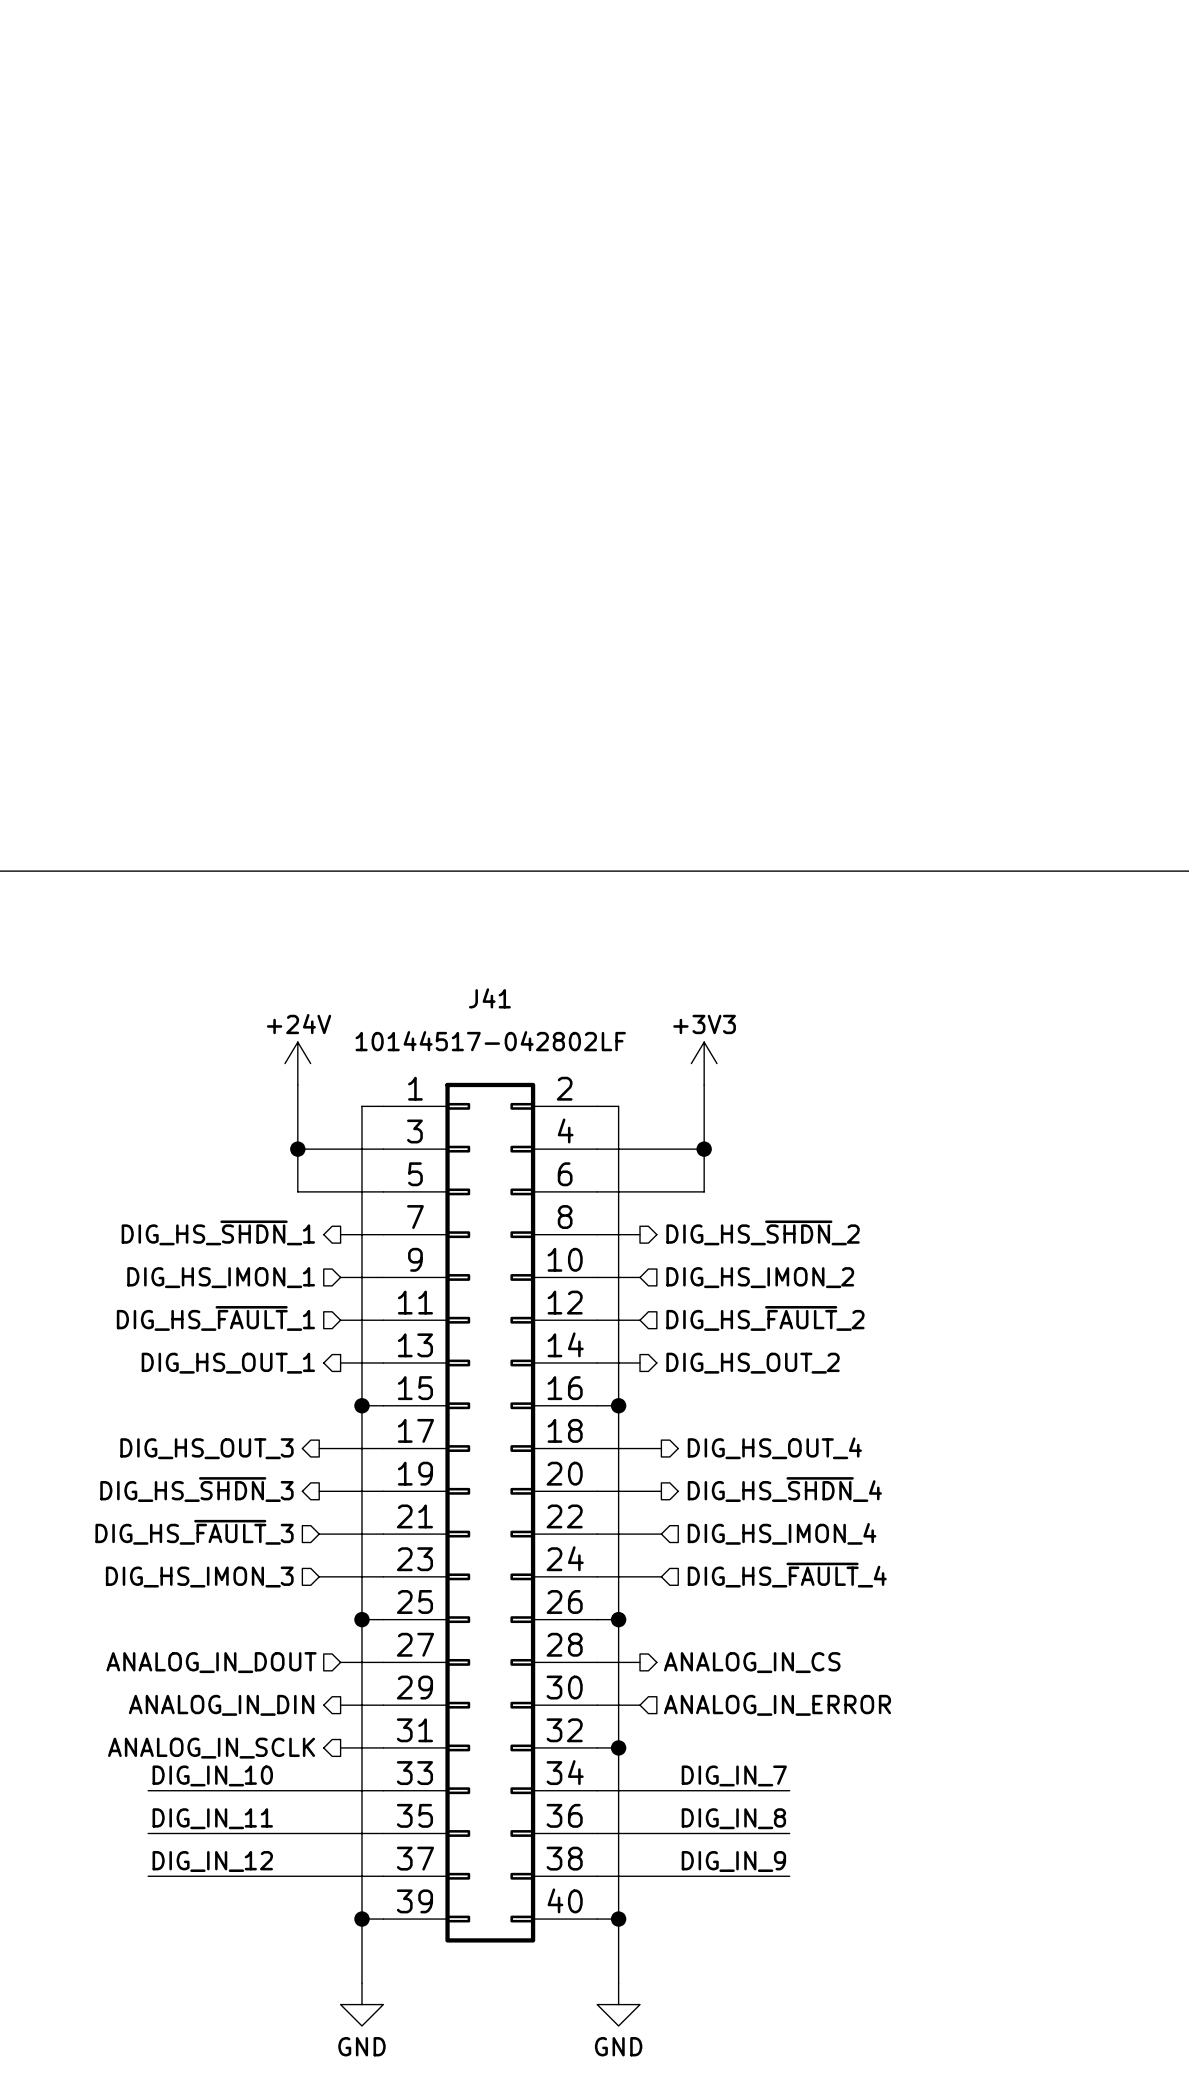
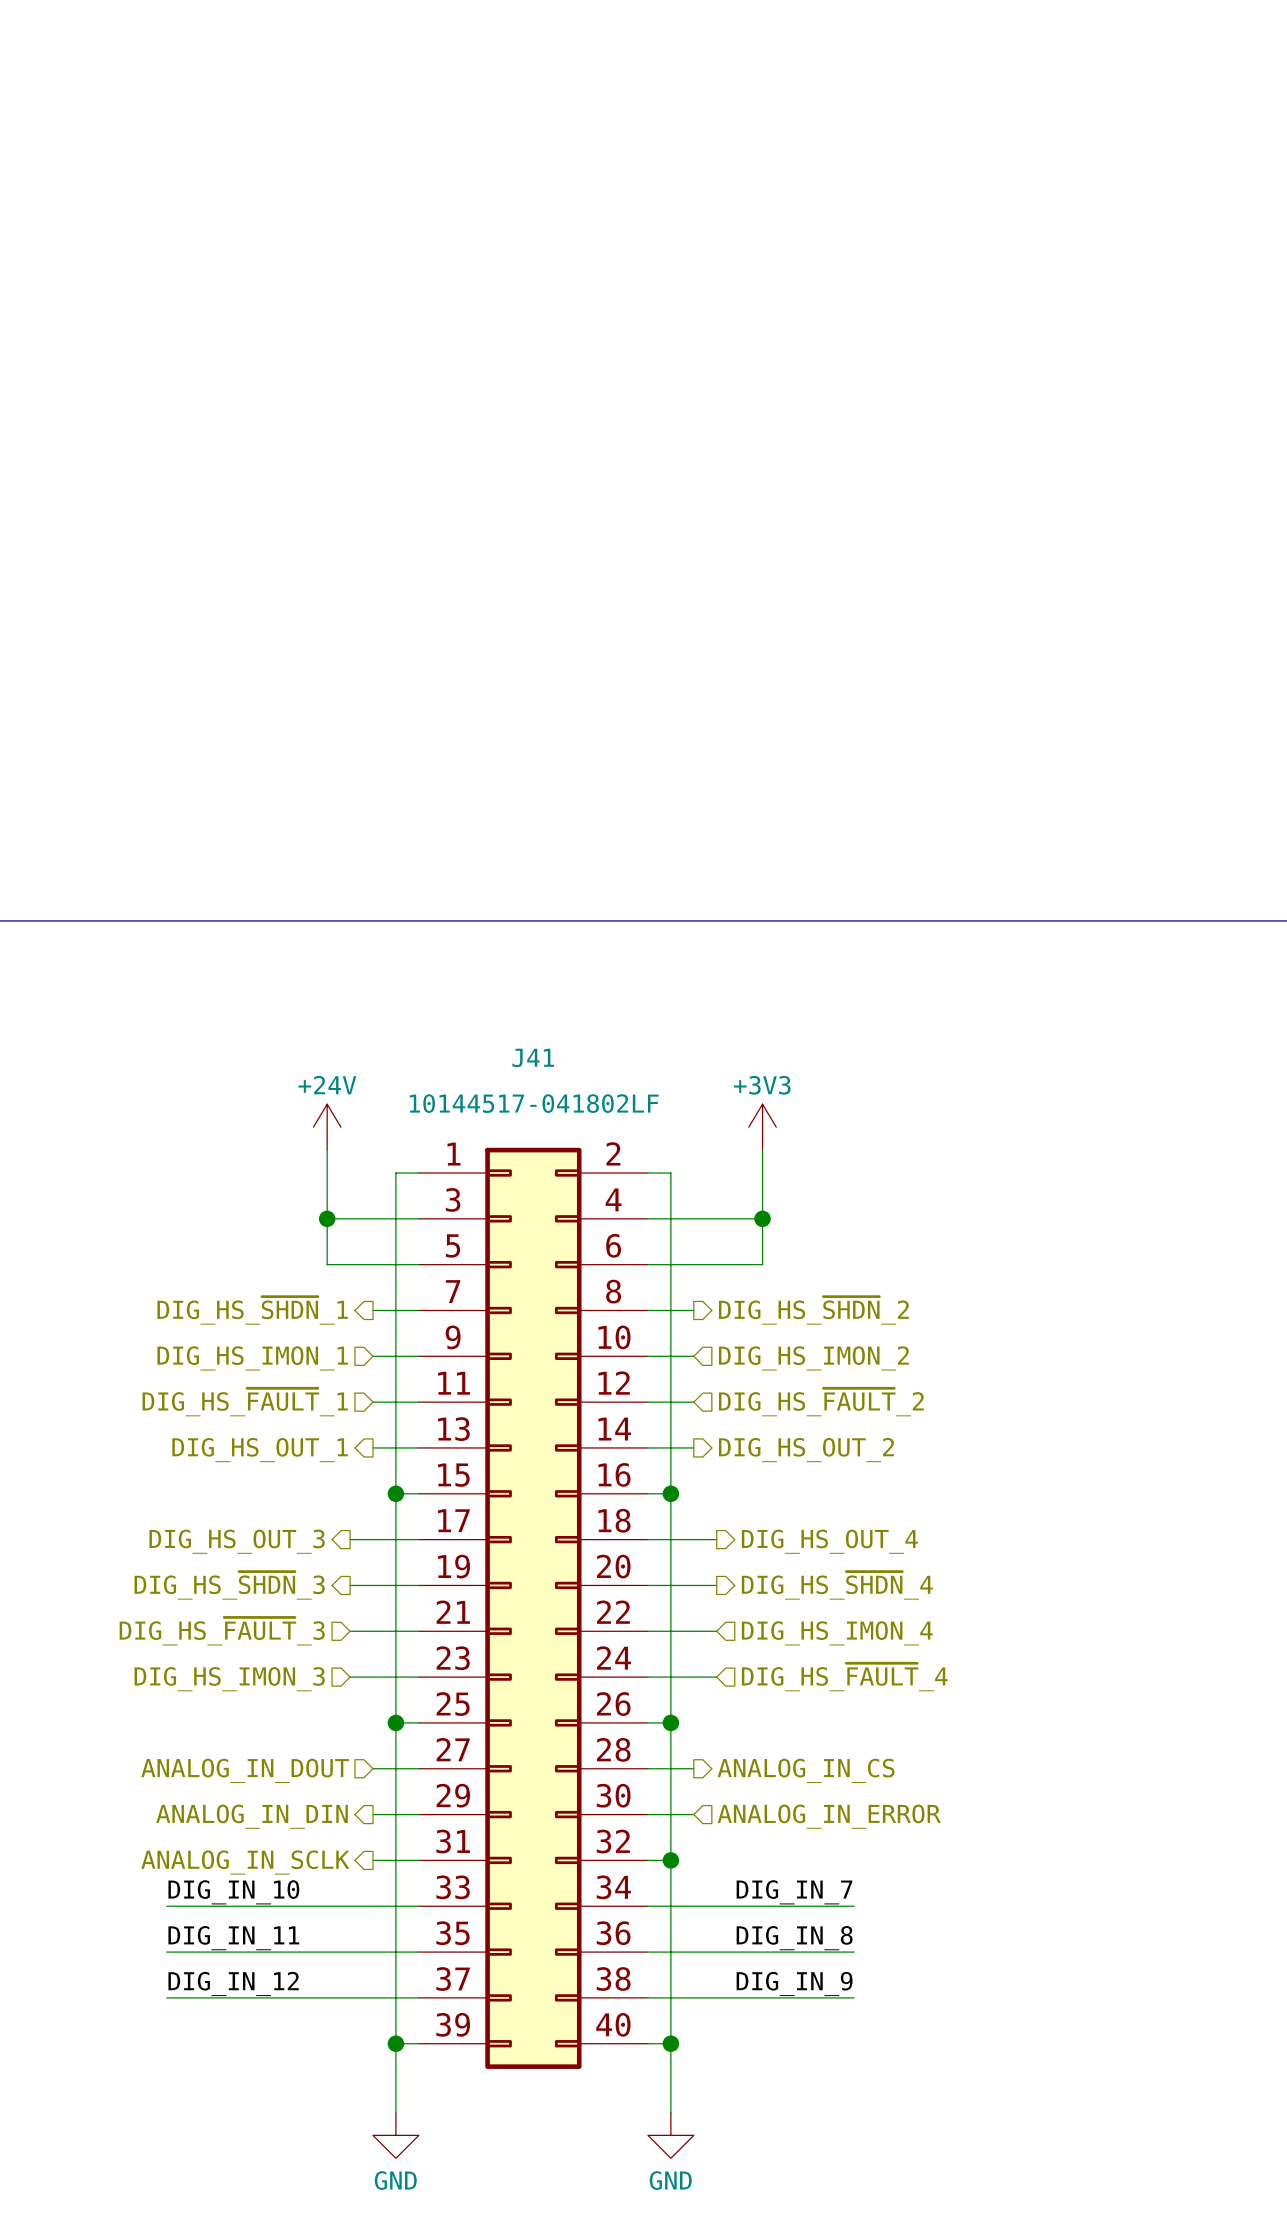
J41 value: 10144517-042802LF (490, 1041) -> 10144517-041802LF (534, 1103)

